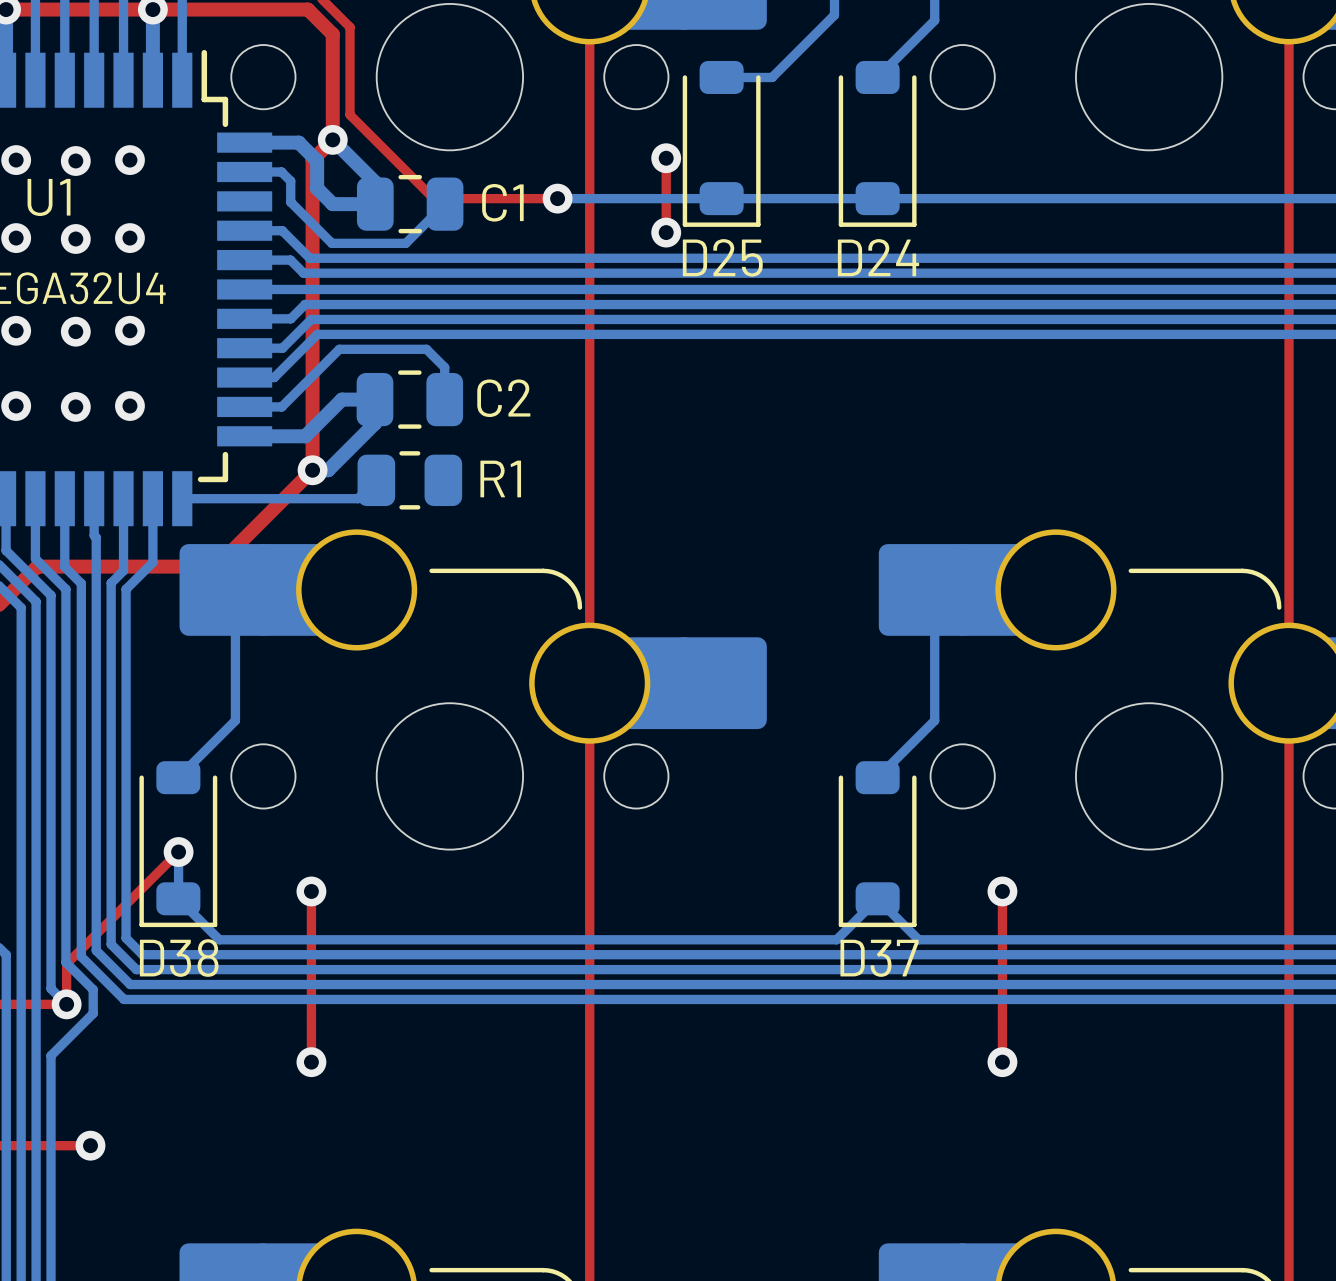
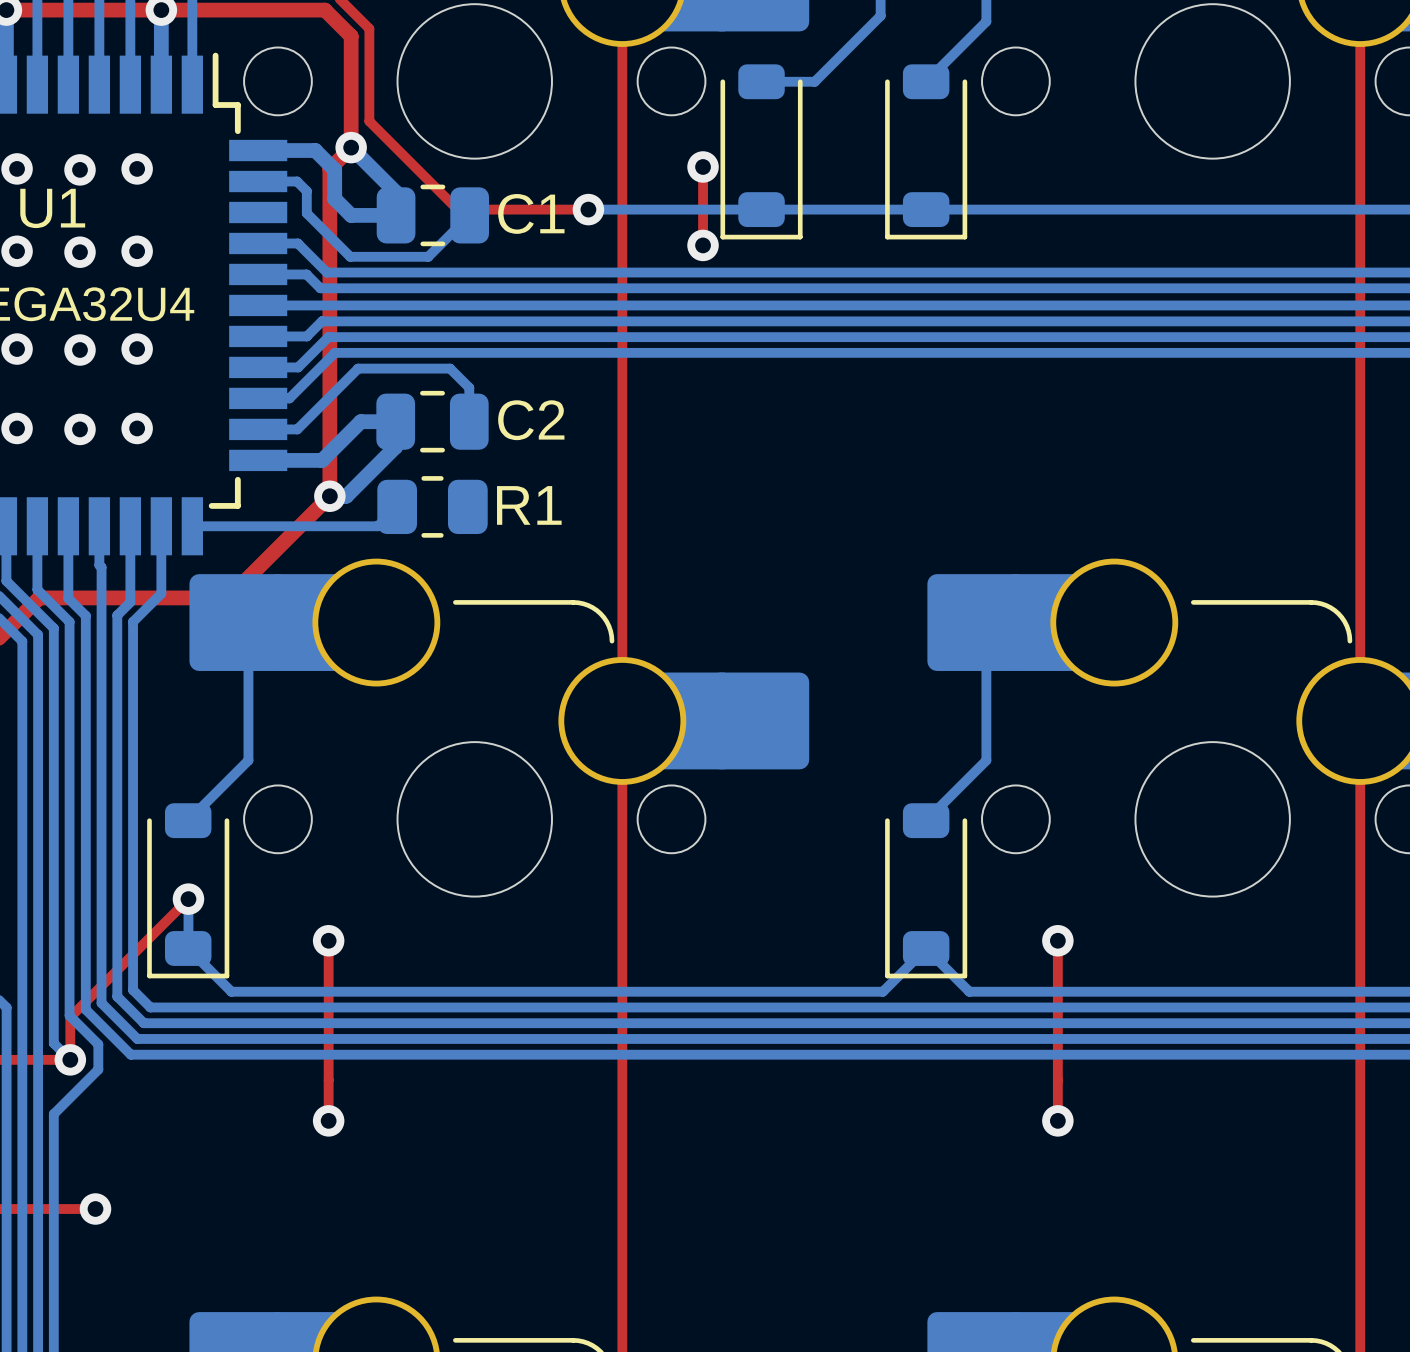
D25 name: D25 (722, 257) -> none
D24 name: D24 (878, 257) -> none
D38 name: D38 (179, 958) -> none
D37 name: D37 (879, 958) -> none

